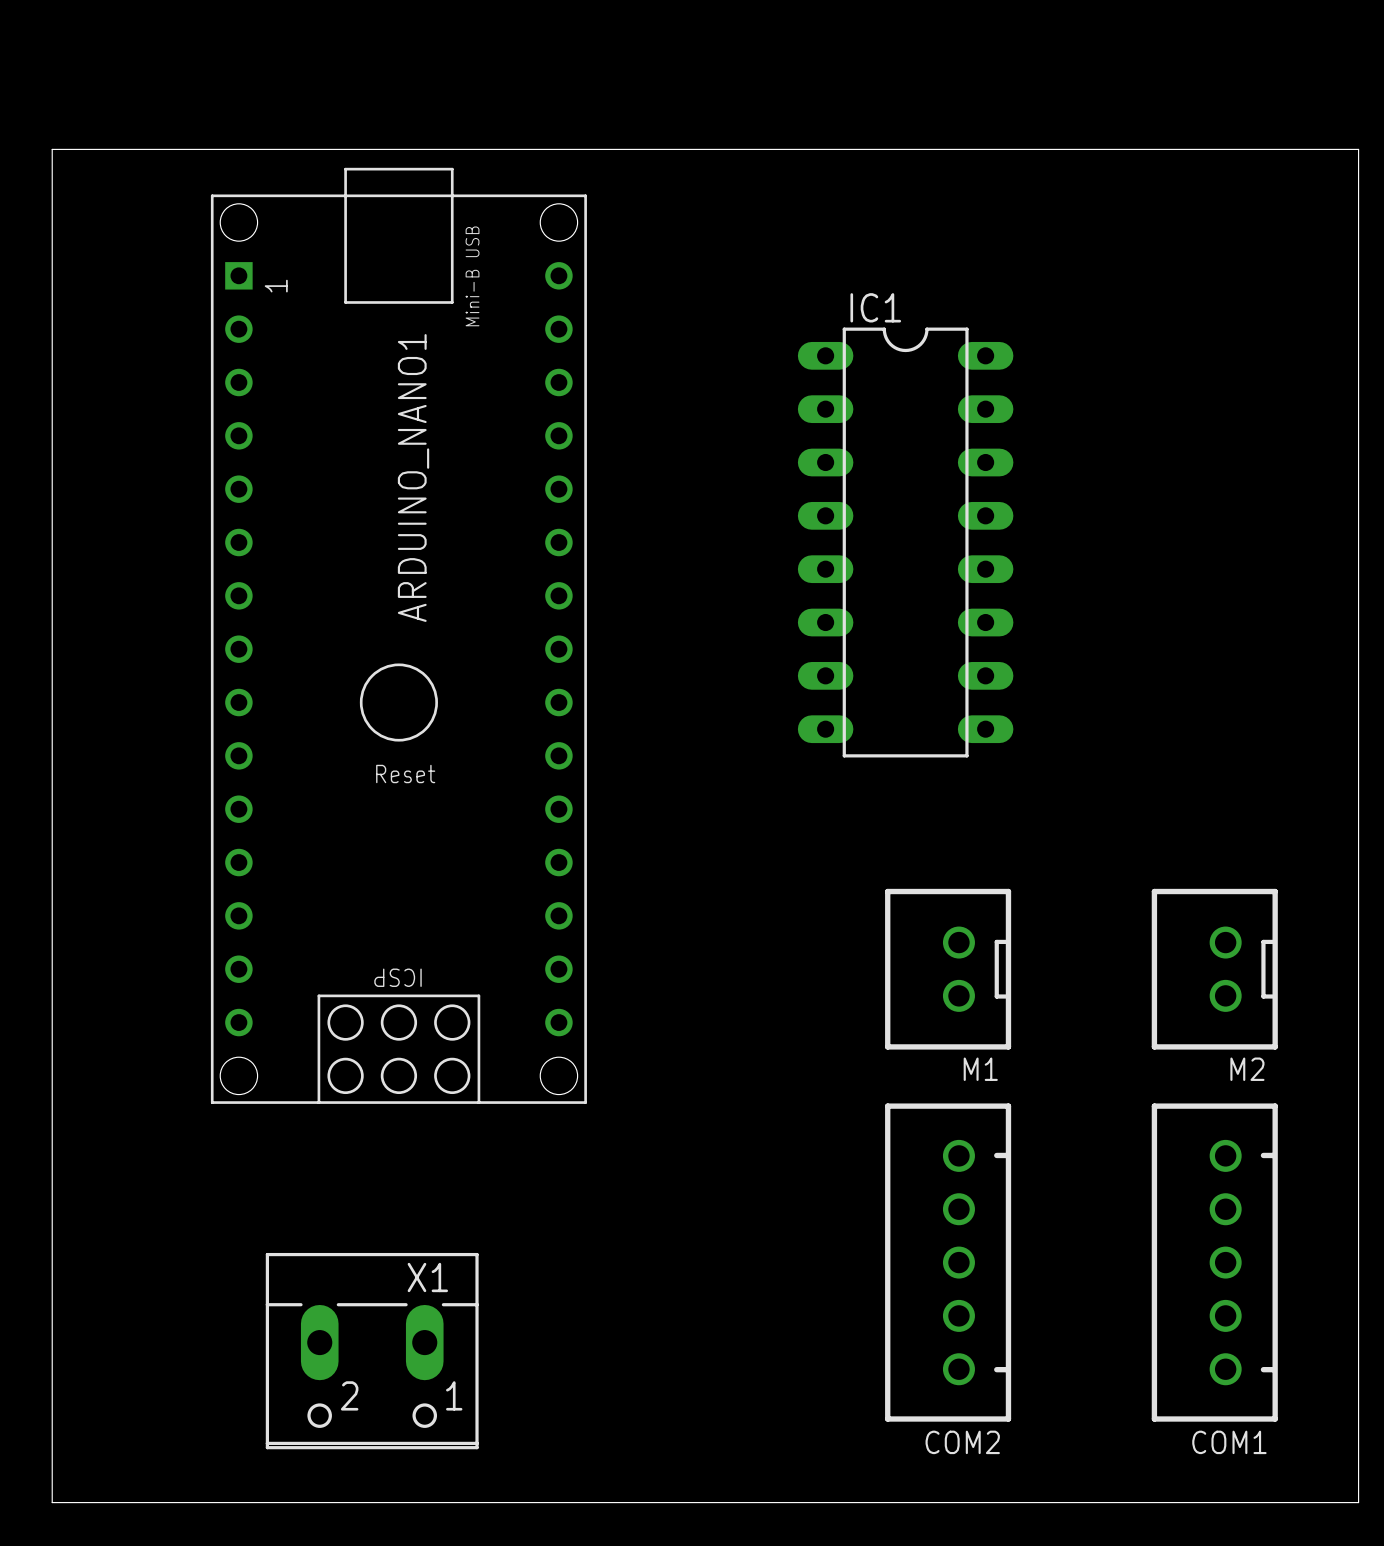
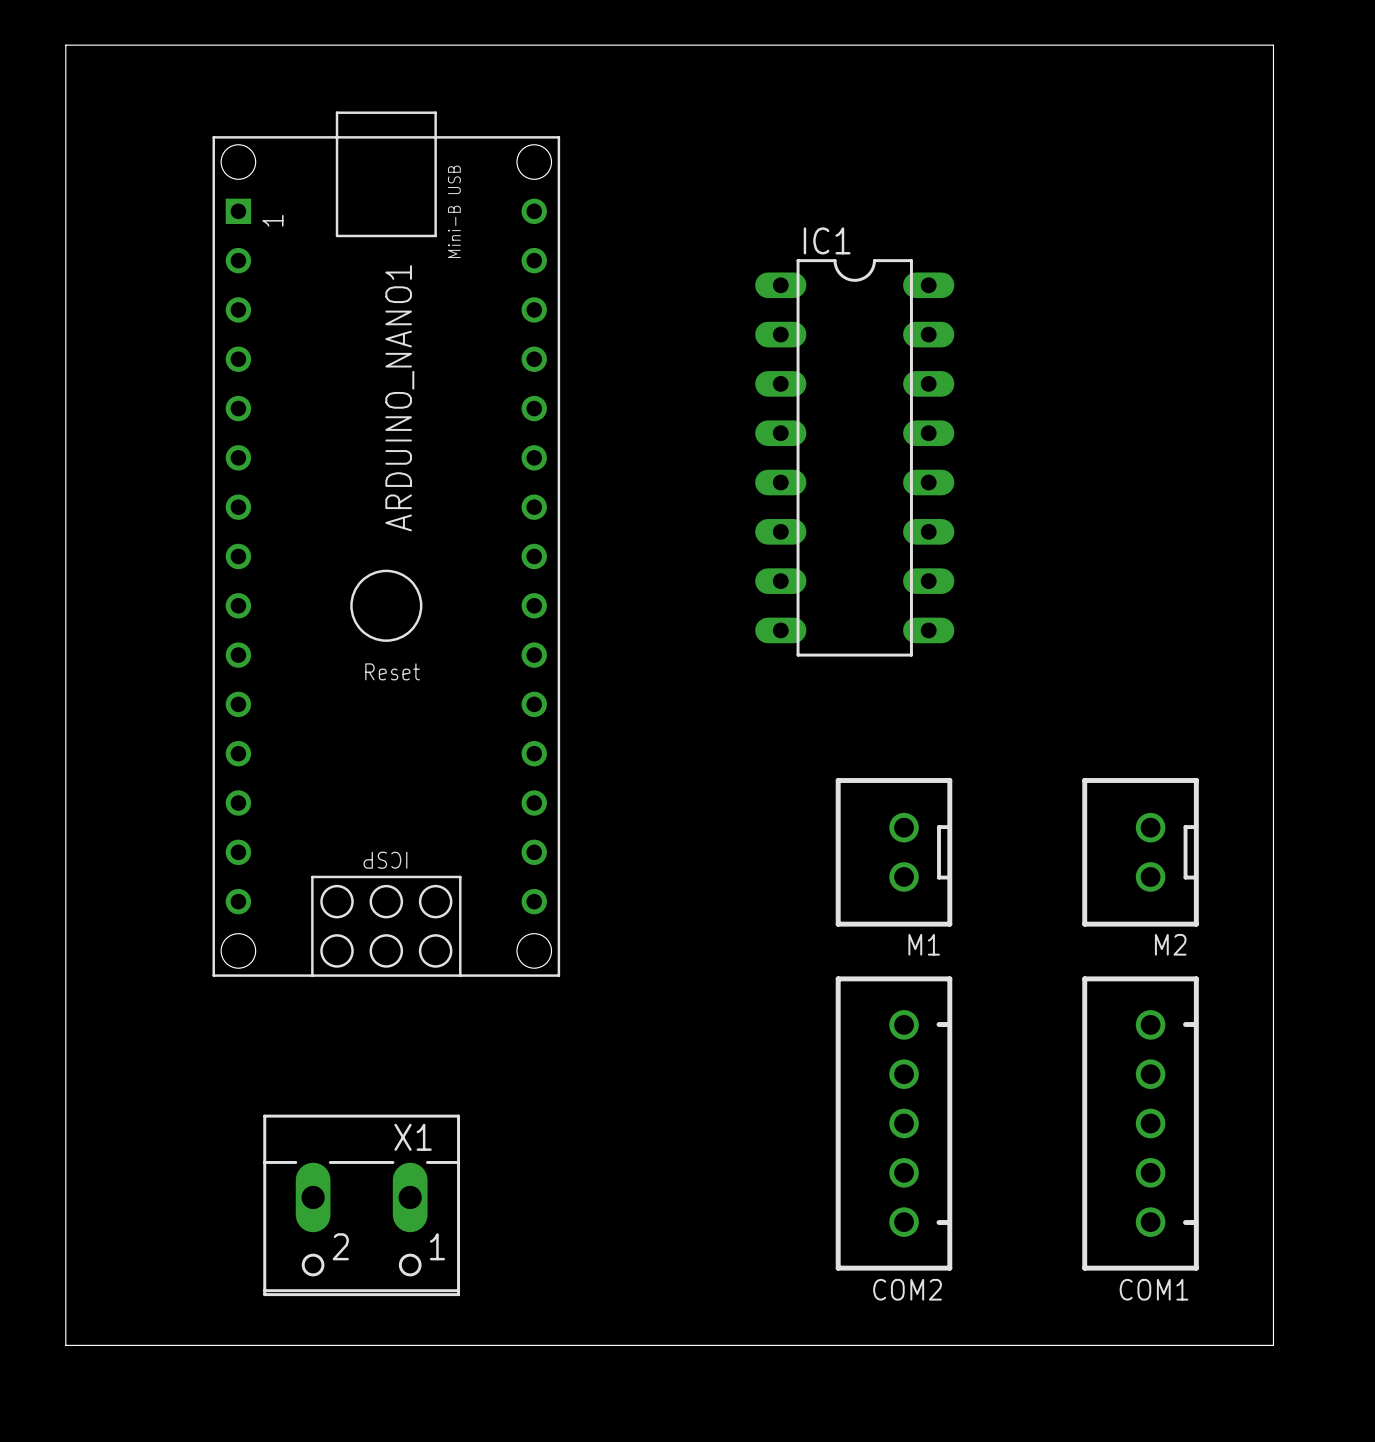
board edge: (52, 149) (1358, 149) -> (65, 94) (65, 45) (1273, 45) (1273, 94)

